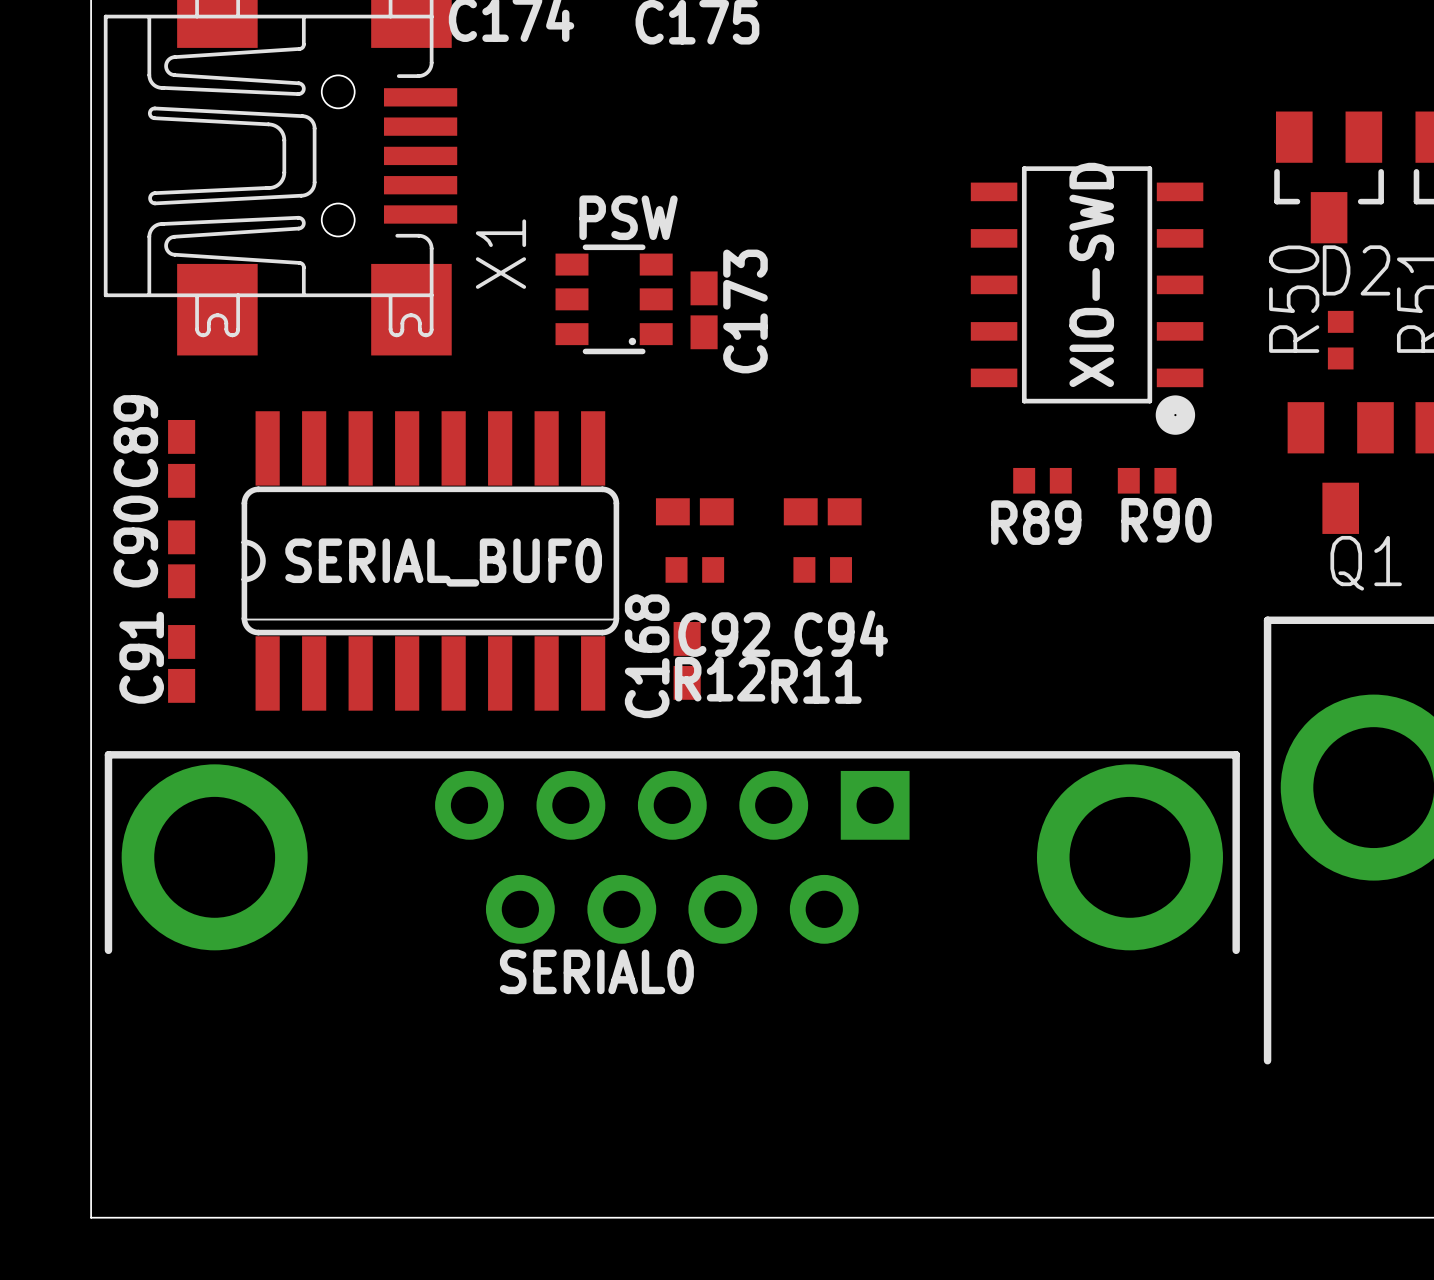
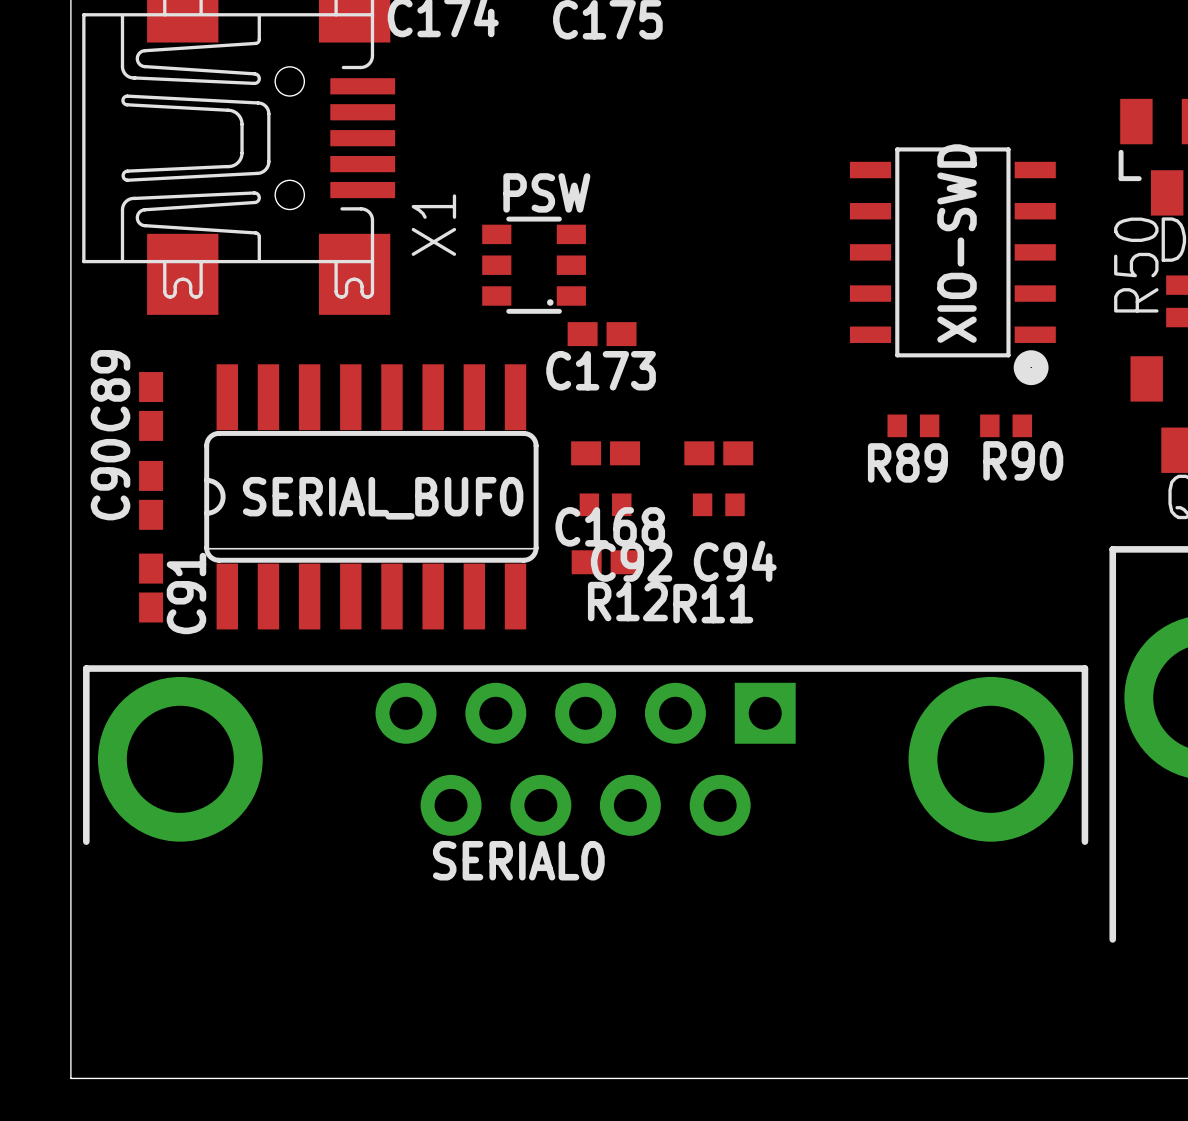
C173 rotation: 0° (704, 310) -> 90° clockwise (602, 334)
C173 position: (704, 310) -> (602, 334)
C91 name position: C91 (141, 657) -> C91 (186, 593)
C168 rotation: 0° (687, 660) -> 90° clockwise (606, 562)

